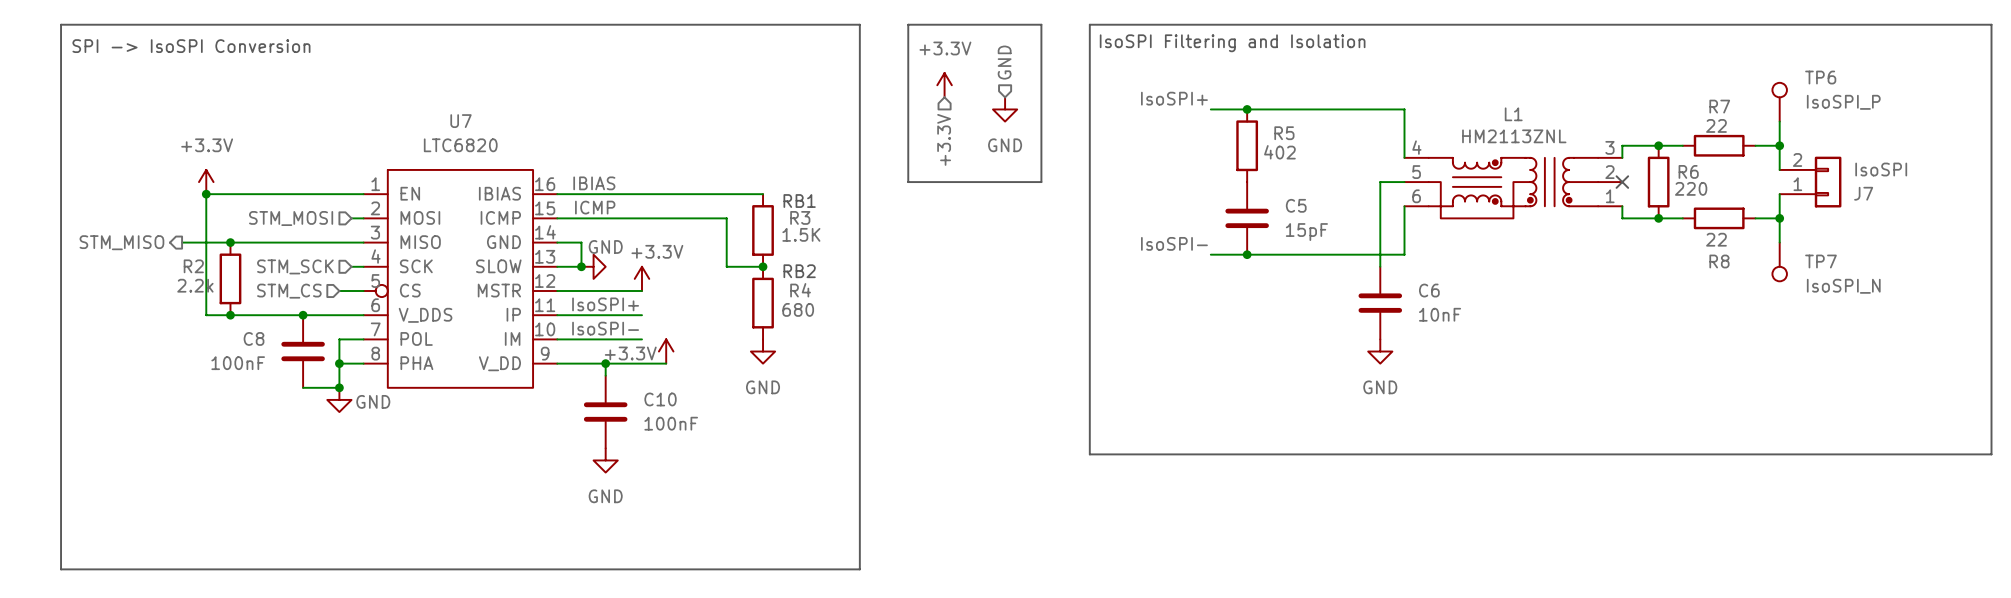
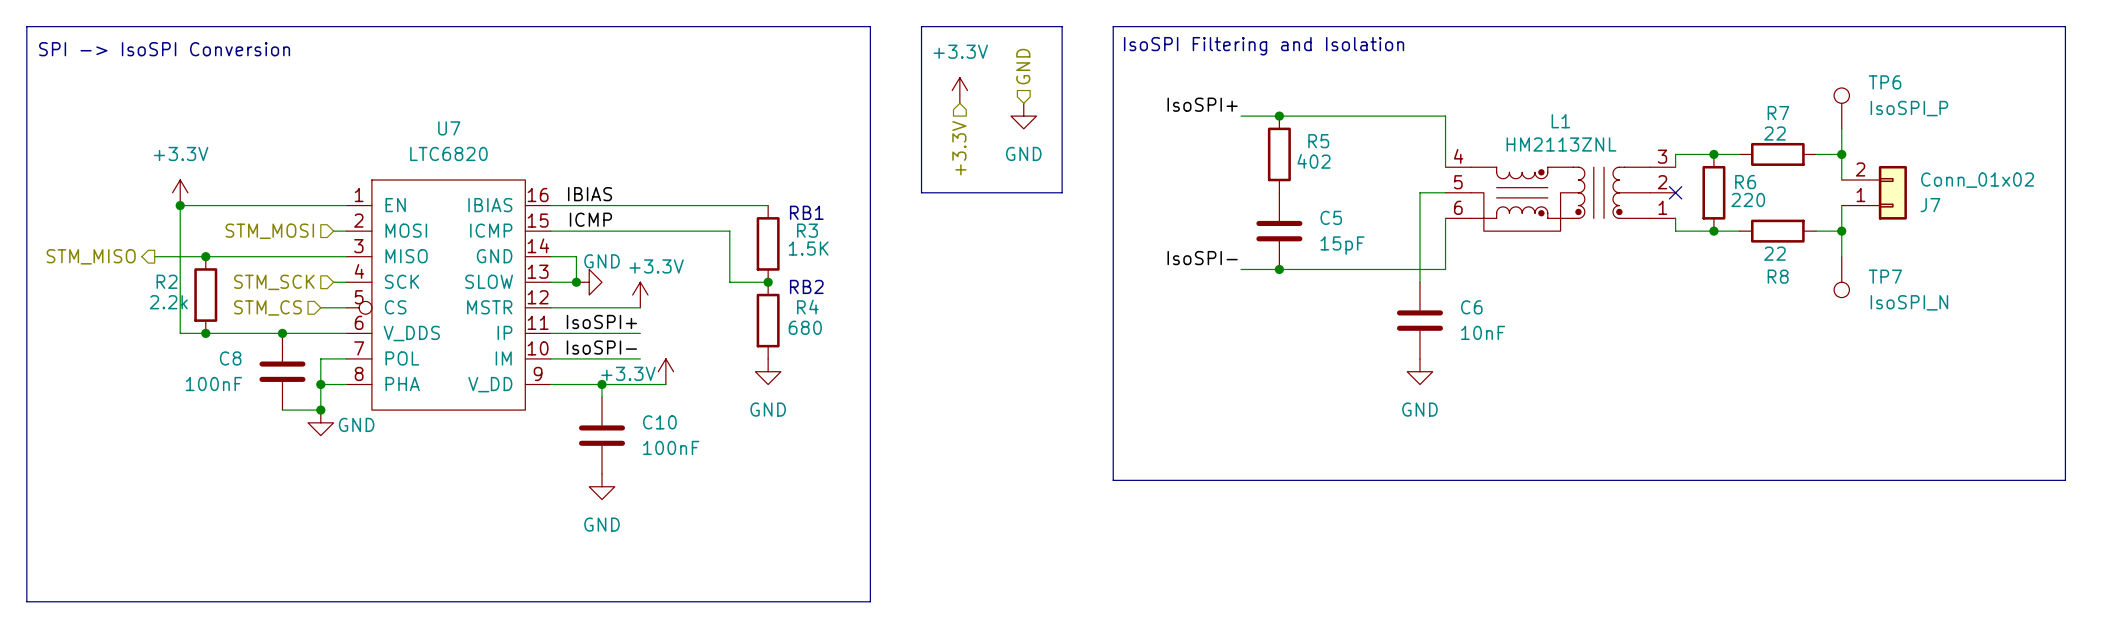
J7 value: IsoSPI (1881, 169) -> Conn_01x02 (1977, 180)

